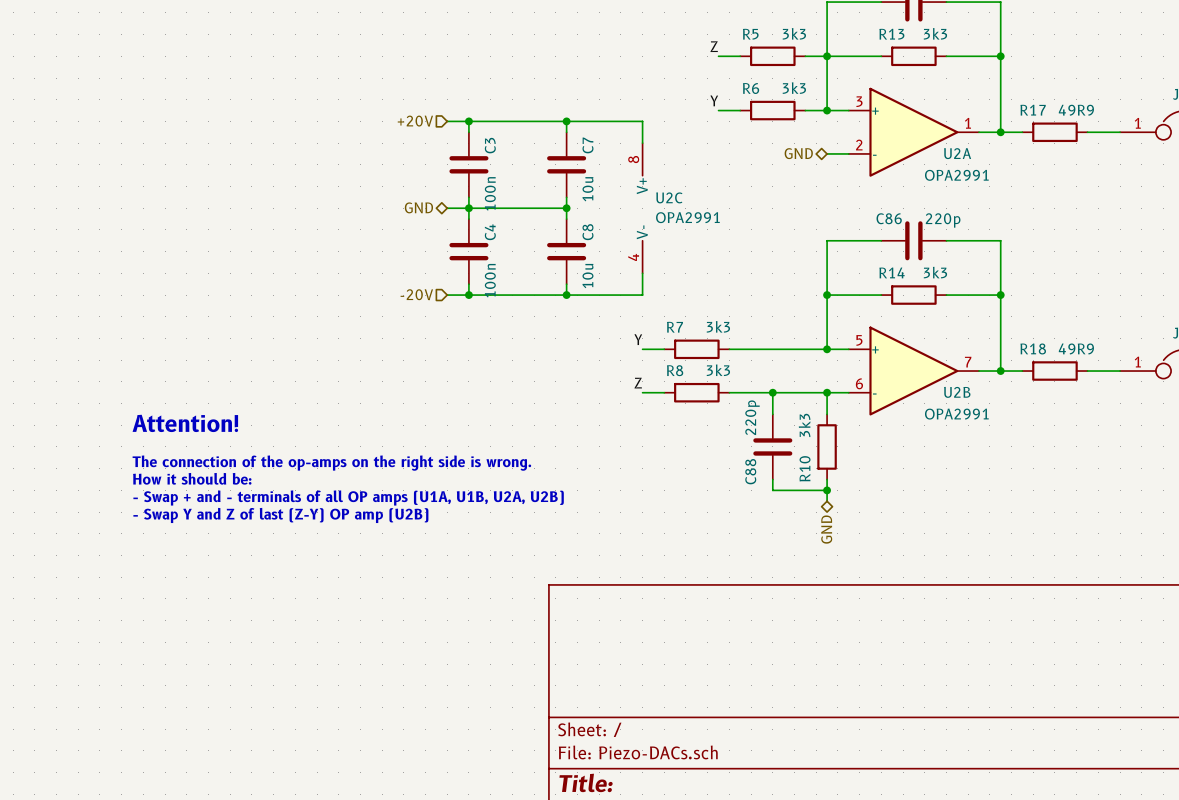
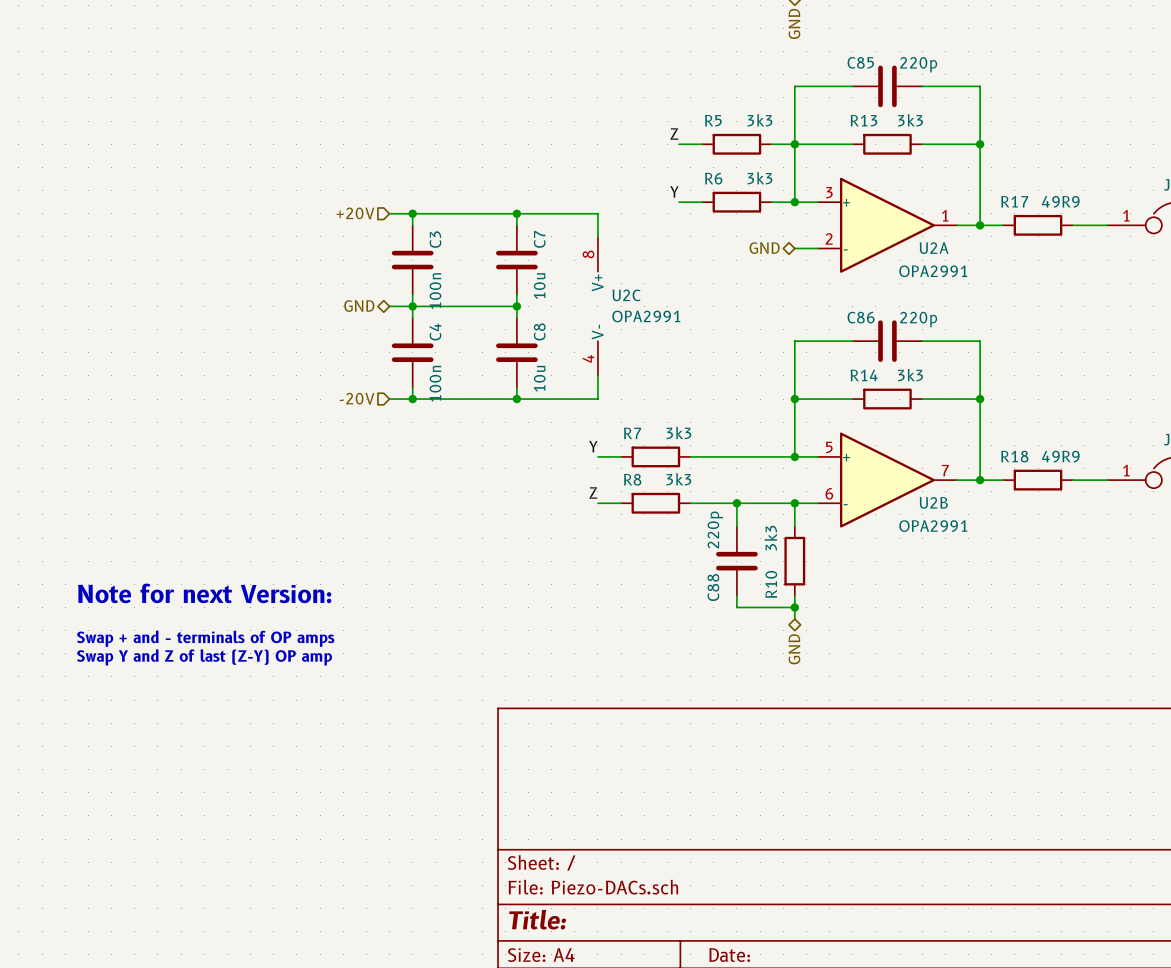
text: Attention! (185, 423) -> none
text: The connection of the op-amps on the right side is wrong. (331, 463) -> none
text: none -> Note for next Version: (204, 593)
text: How it should be: (192, 478) -> none
text: - Swap + and - terminals of all OP amps (U1A, U1B, U2A, U2B) (348, 497) -> Swap + and - terminals of OP amps (205, 638)
text: - Swap Y and Z of last (Z-Y) OP amp (U2B) (280, 515) -> Swap Y and Z of last (Z-Y) OP amp (204, 657)

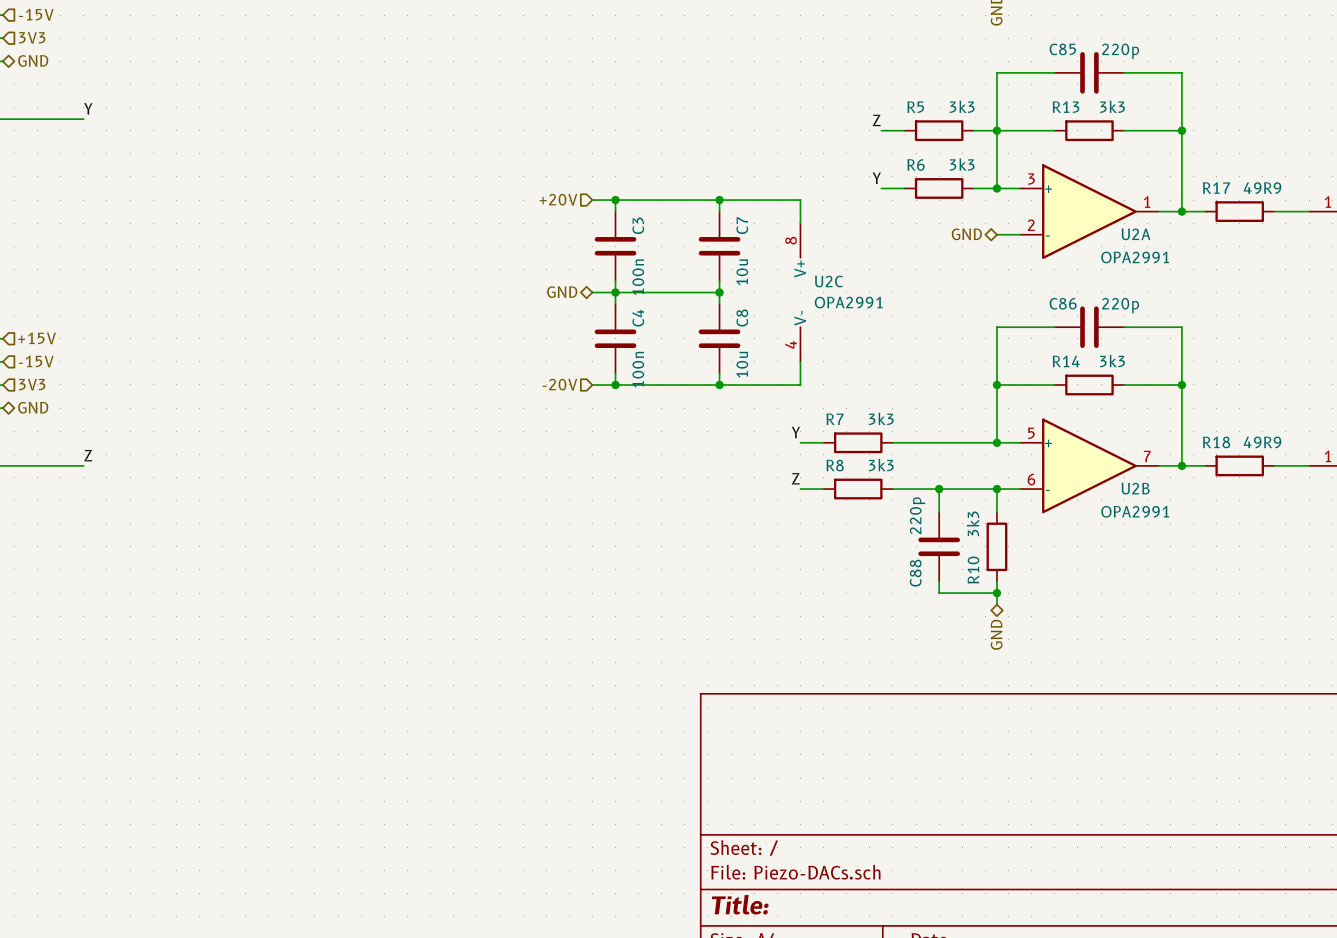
text: Note for next Version: (204, 593) -> none
text: Swap + and - terminals of OP amps (205, 638) -> none
text: Swap Y and Z of last (Z-Y) OP amp (204, 657) -> none

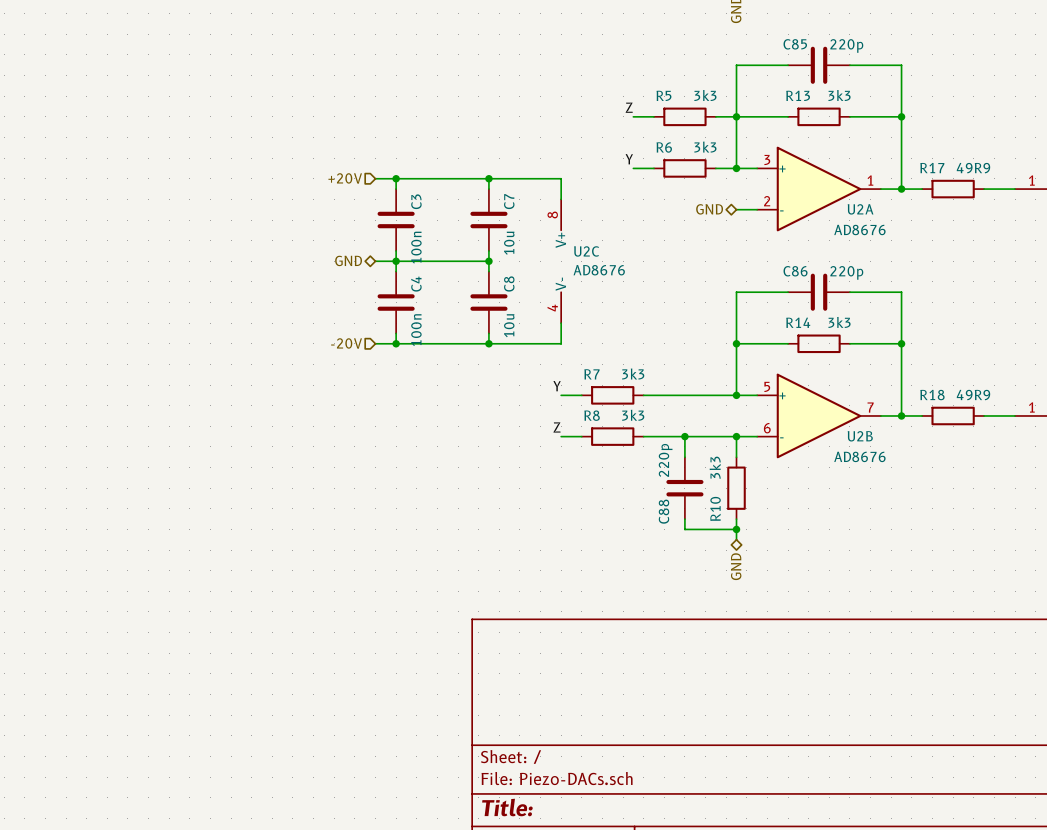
U2A value: OPA2991 (1135, 257) -> AD8676 (859, 229)
U2C value: OPA2991 (848, 302) -> AD8676 (599, 270)
U2B value: OPA2991 (1135, 511) -> AD8676 (859, 456)

